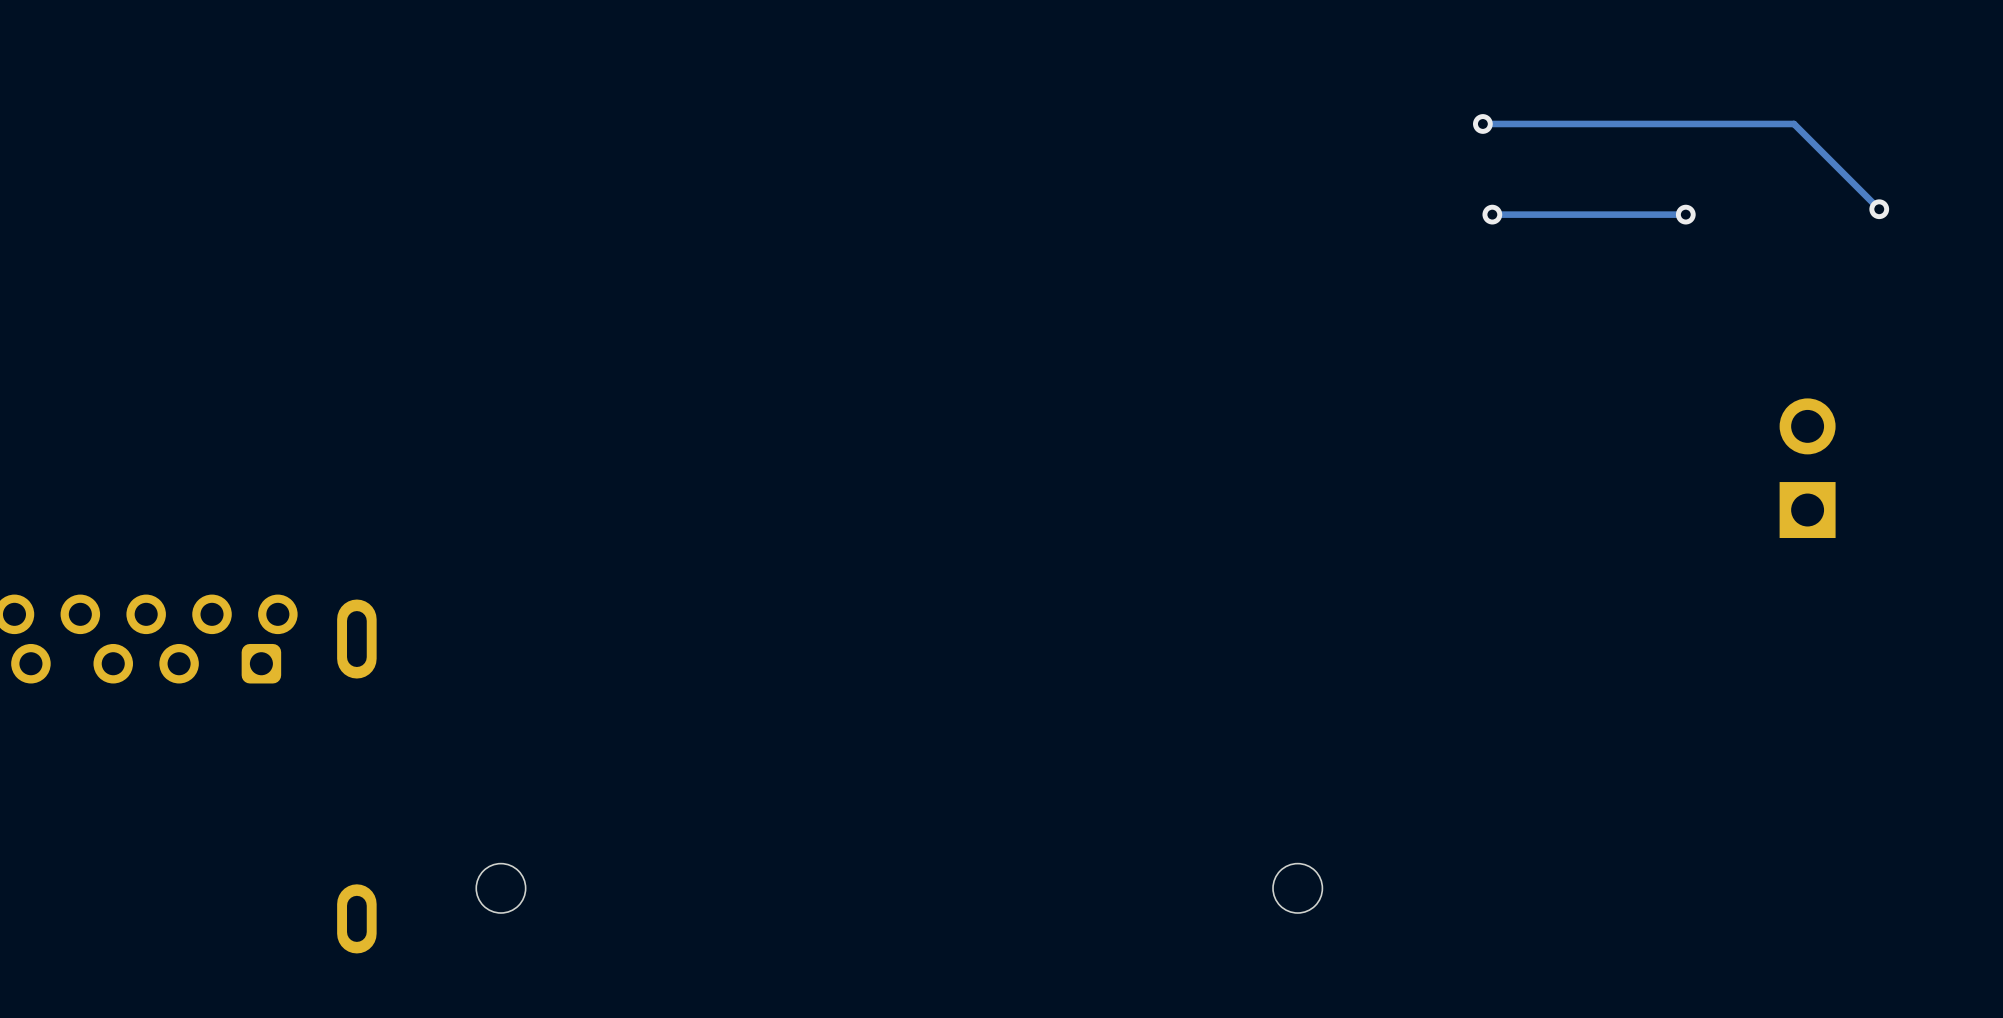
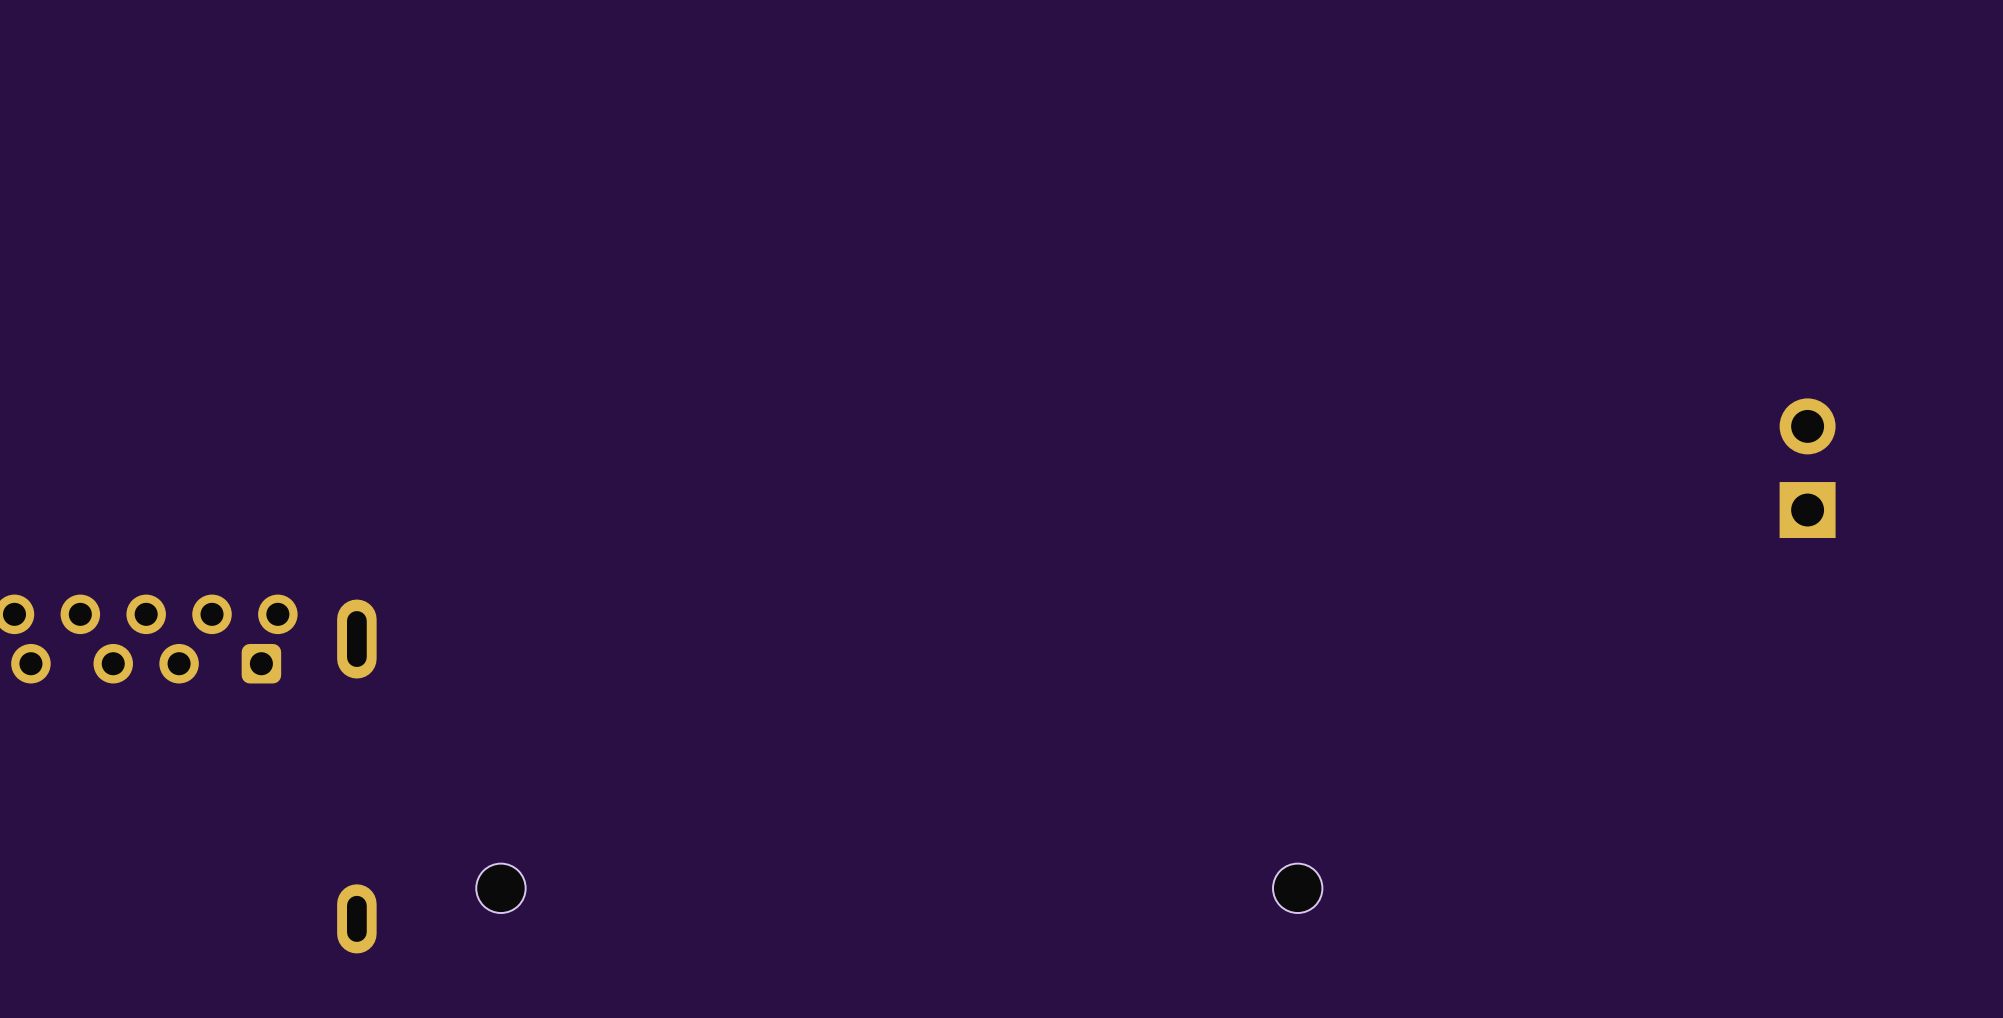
track: (1482, 123) (1794, 123) (1879, 209) -> none
via: (1482, 123) -> none
via: (1879, 209) -> none
via: (1492, 214) -> none
track: (1685, 214) (1492, 214) -> none
via: (1685, 214) -> none

